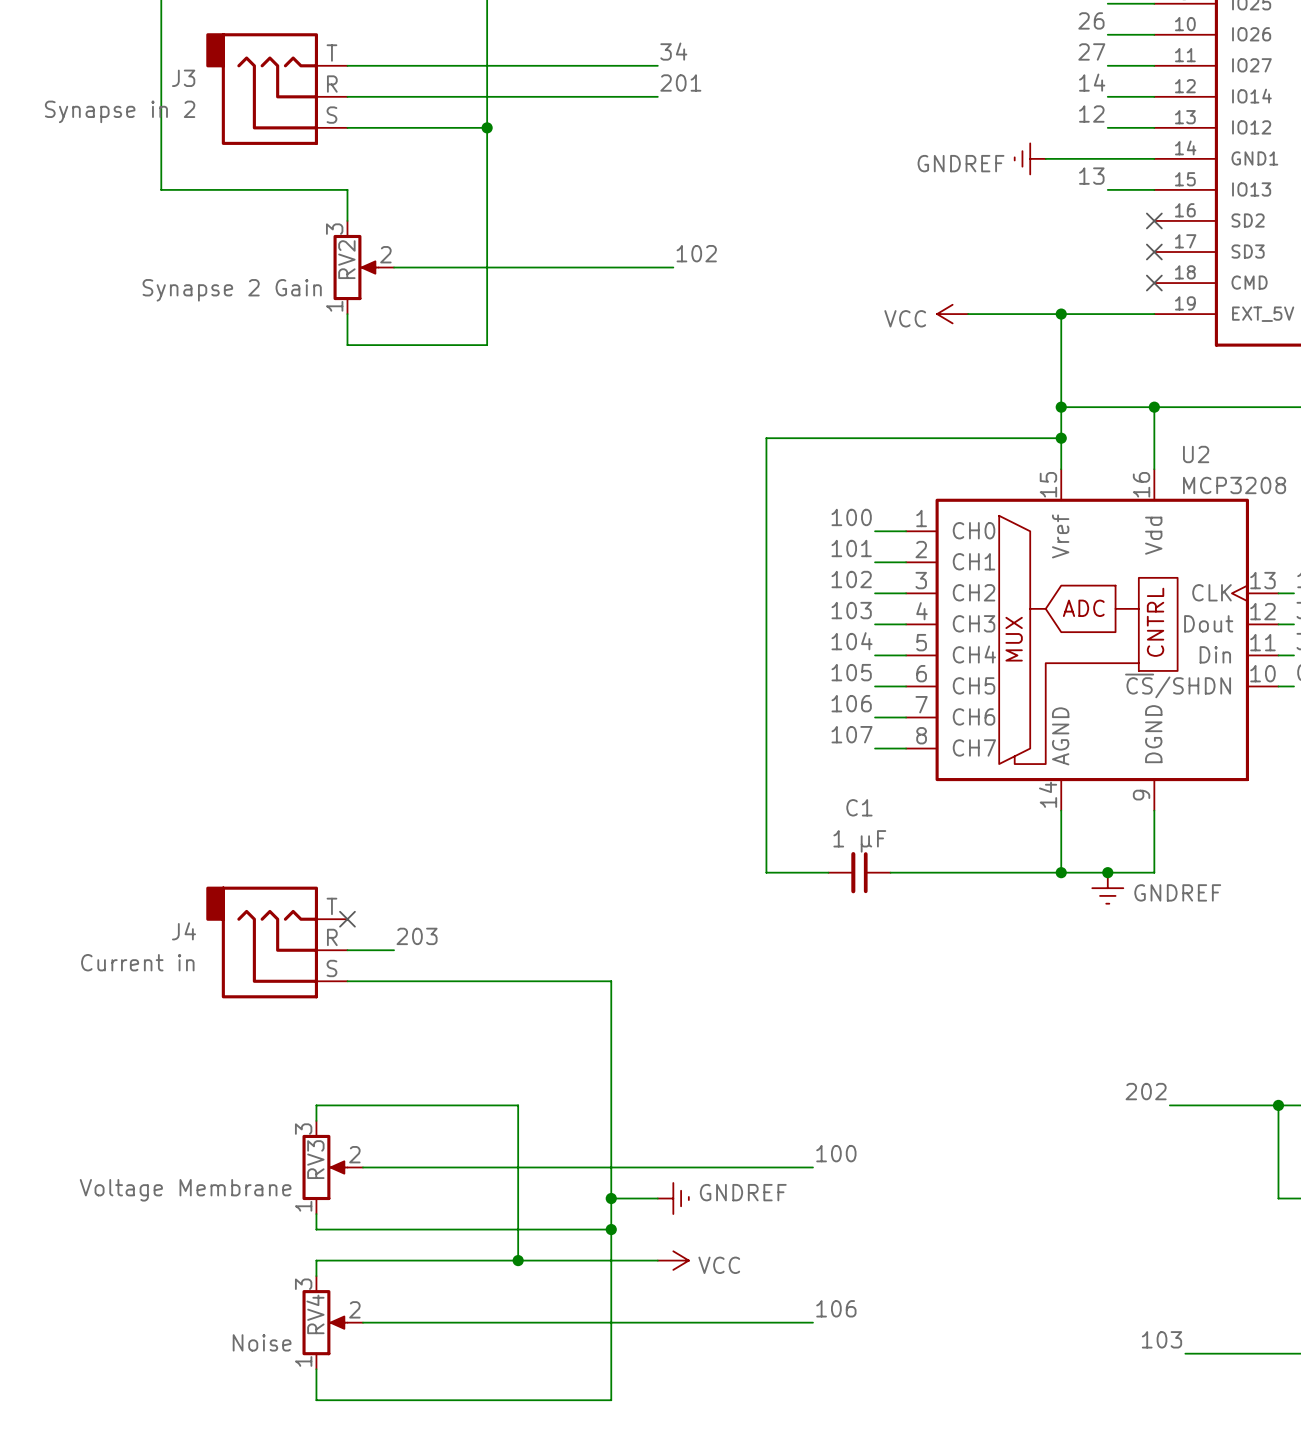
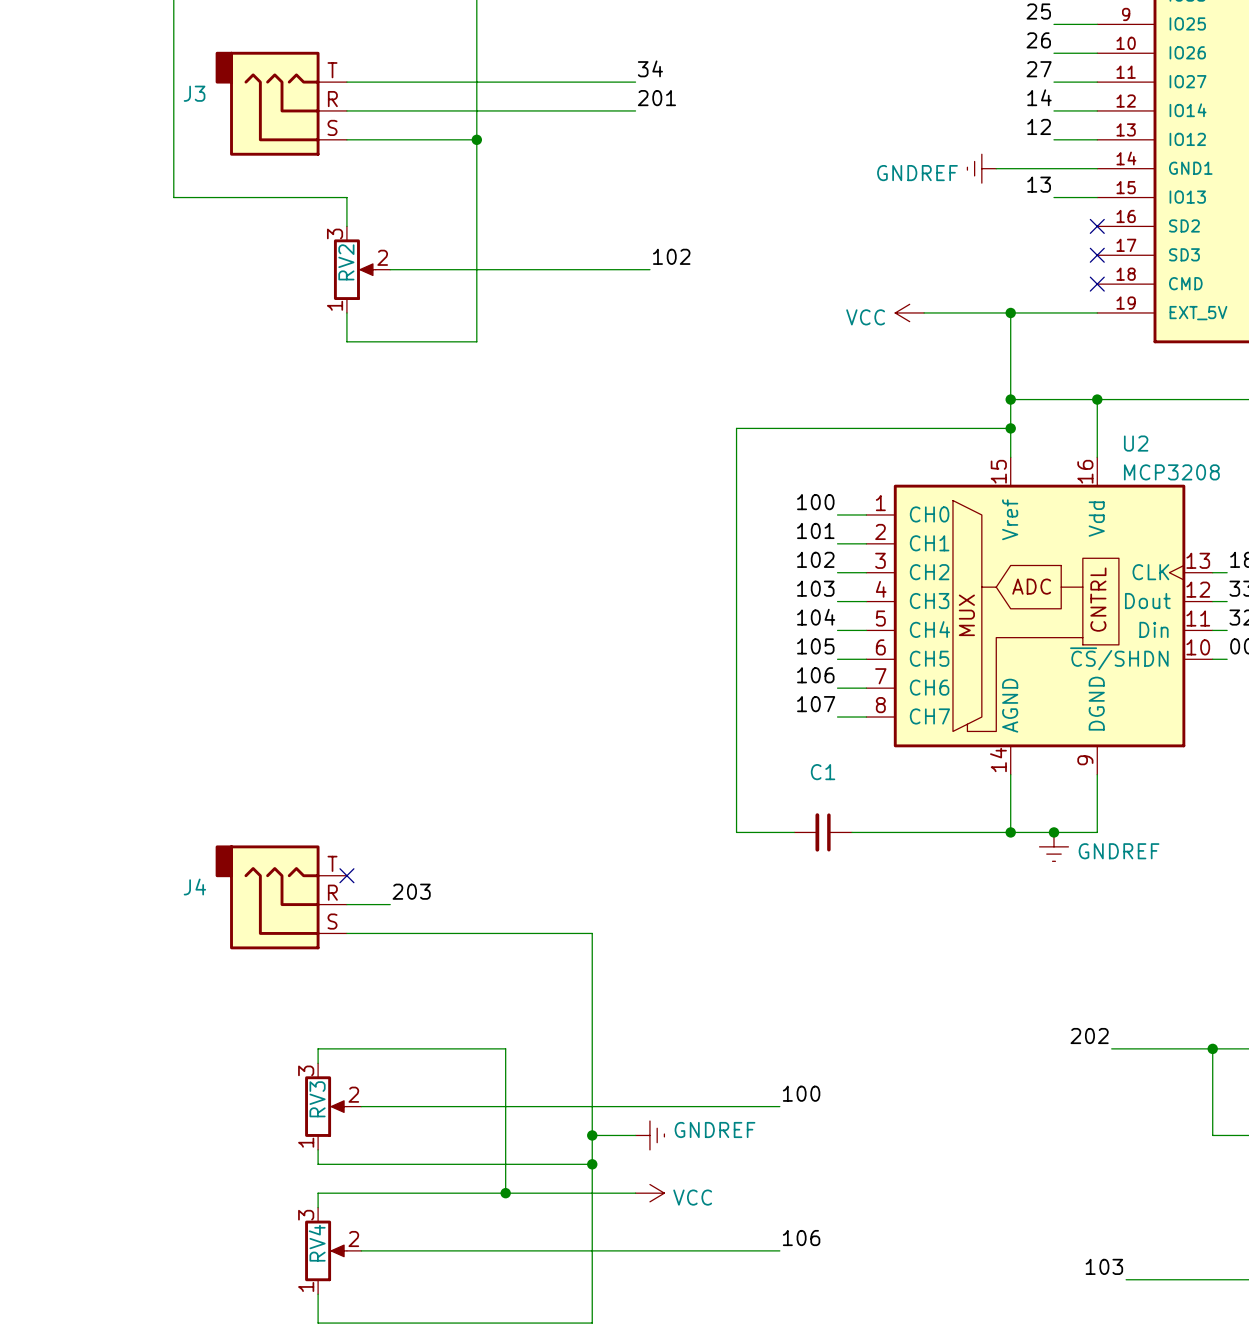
J3 value: Synapse in 2 (120, 111) -> none
RV2 value: Synapse 2 Gain (232, 290) -> none
C1 value: 1 μF (859, 841) -> none
J4 value: Current in (137, 962) -> none
RV3 value: Voltage Membrane (185, 1190) -> none
RV4 value: Noise (262, 1342) -> none

